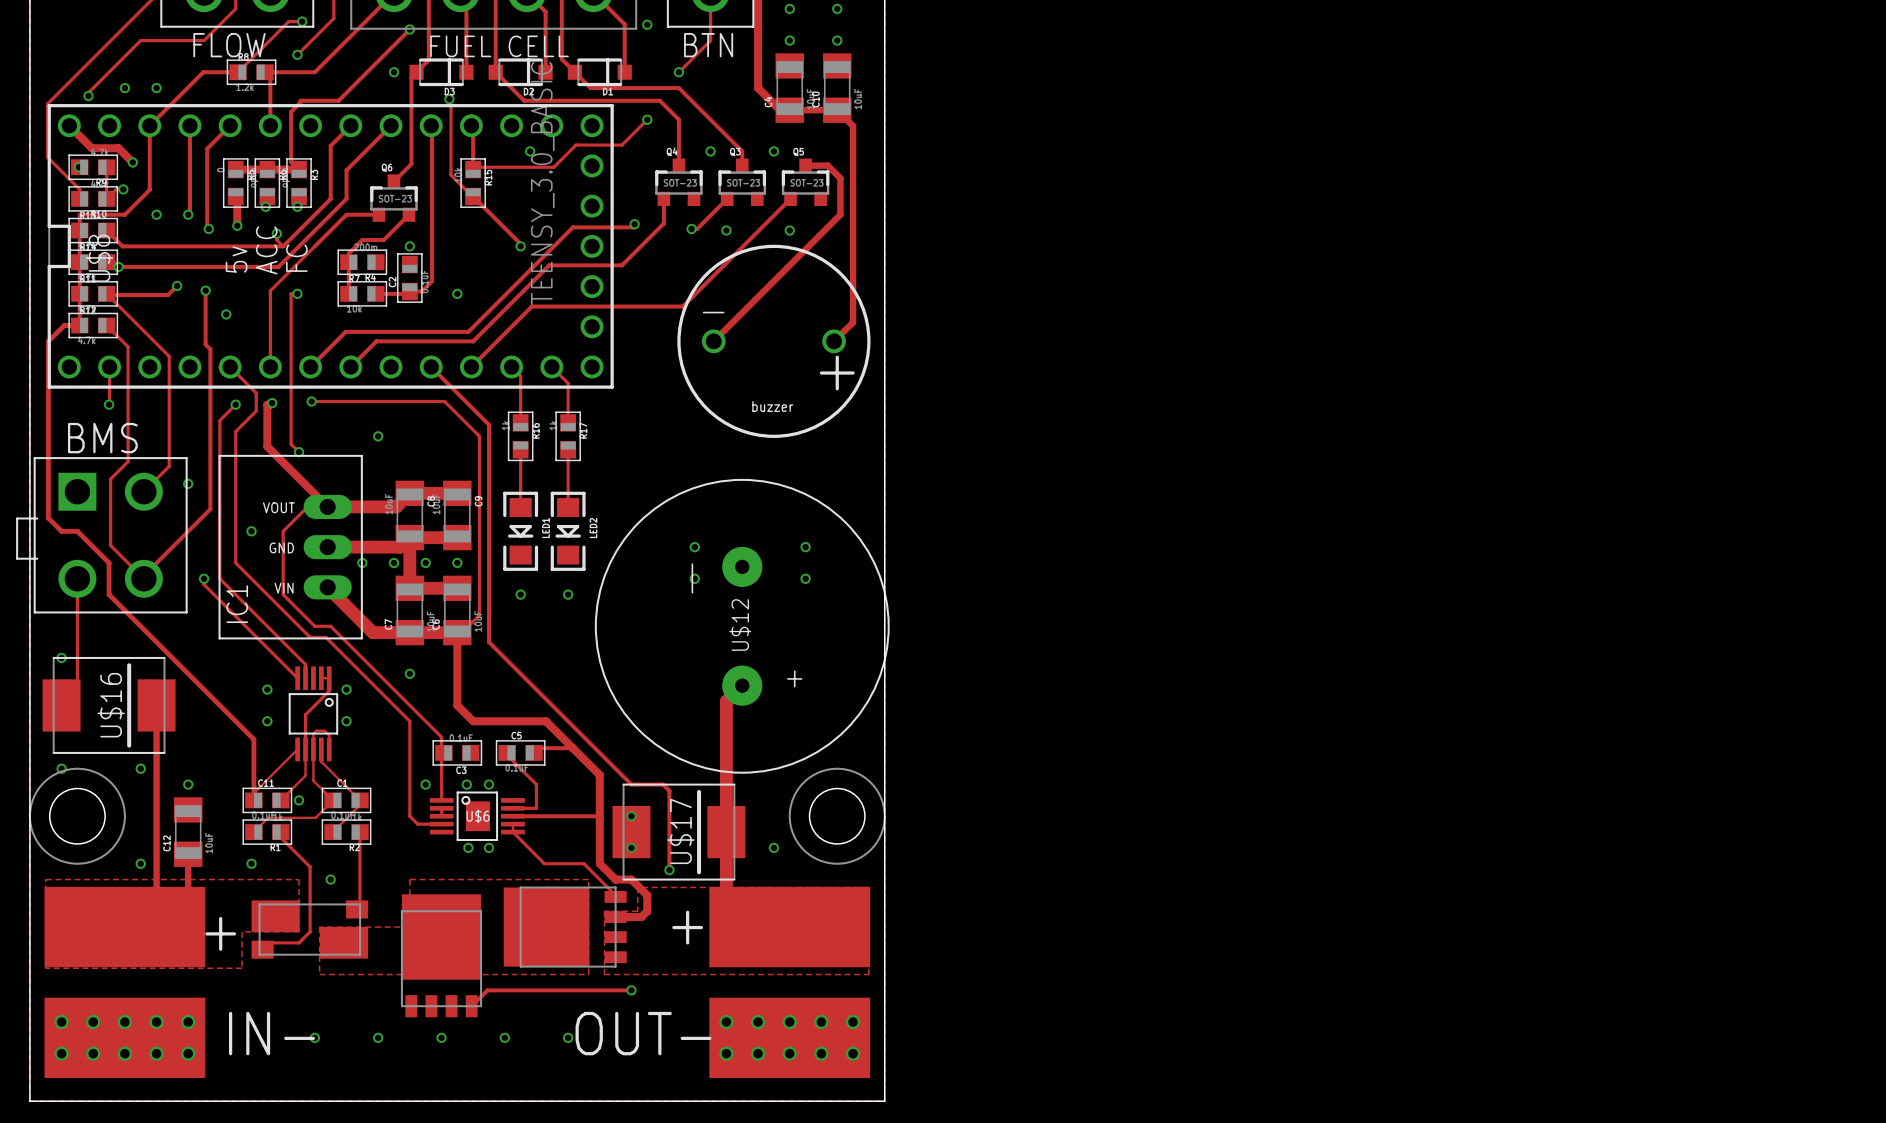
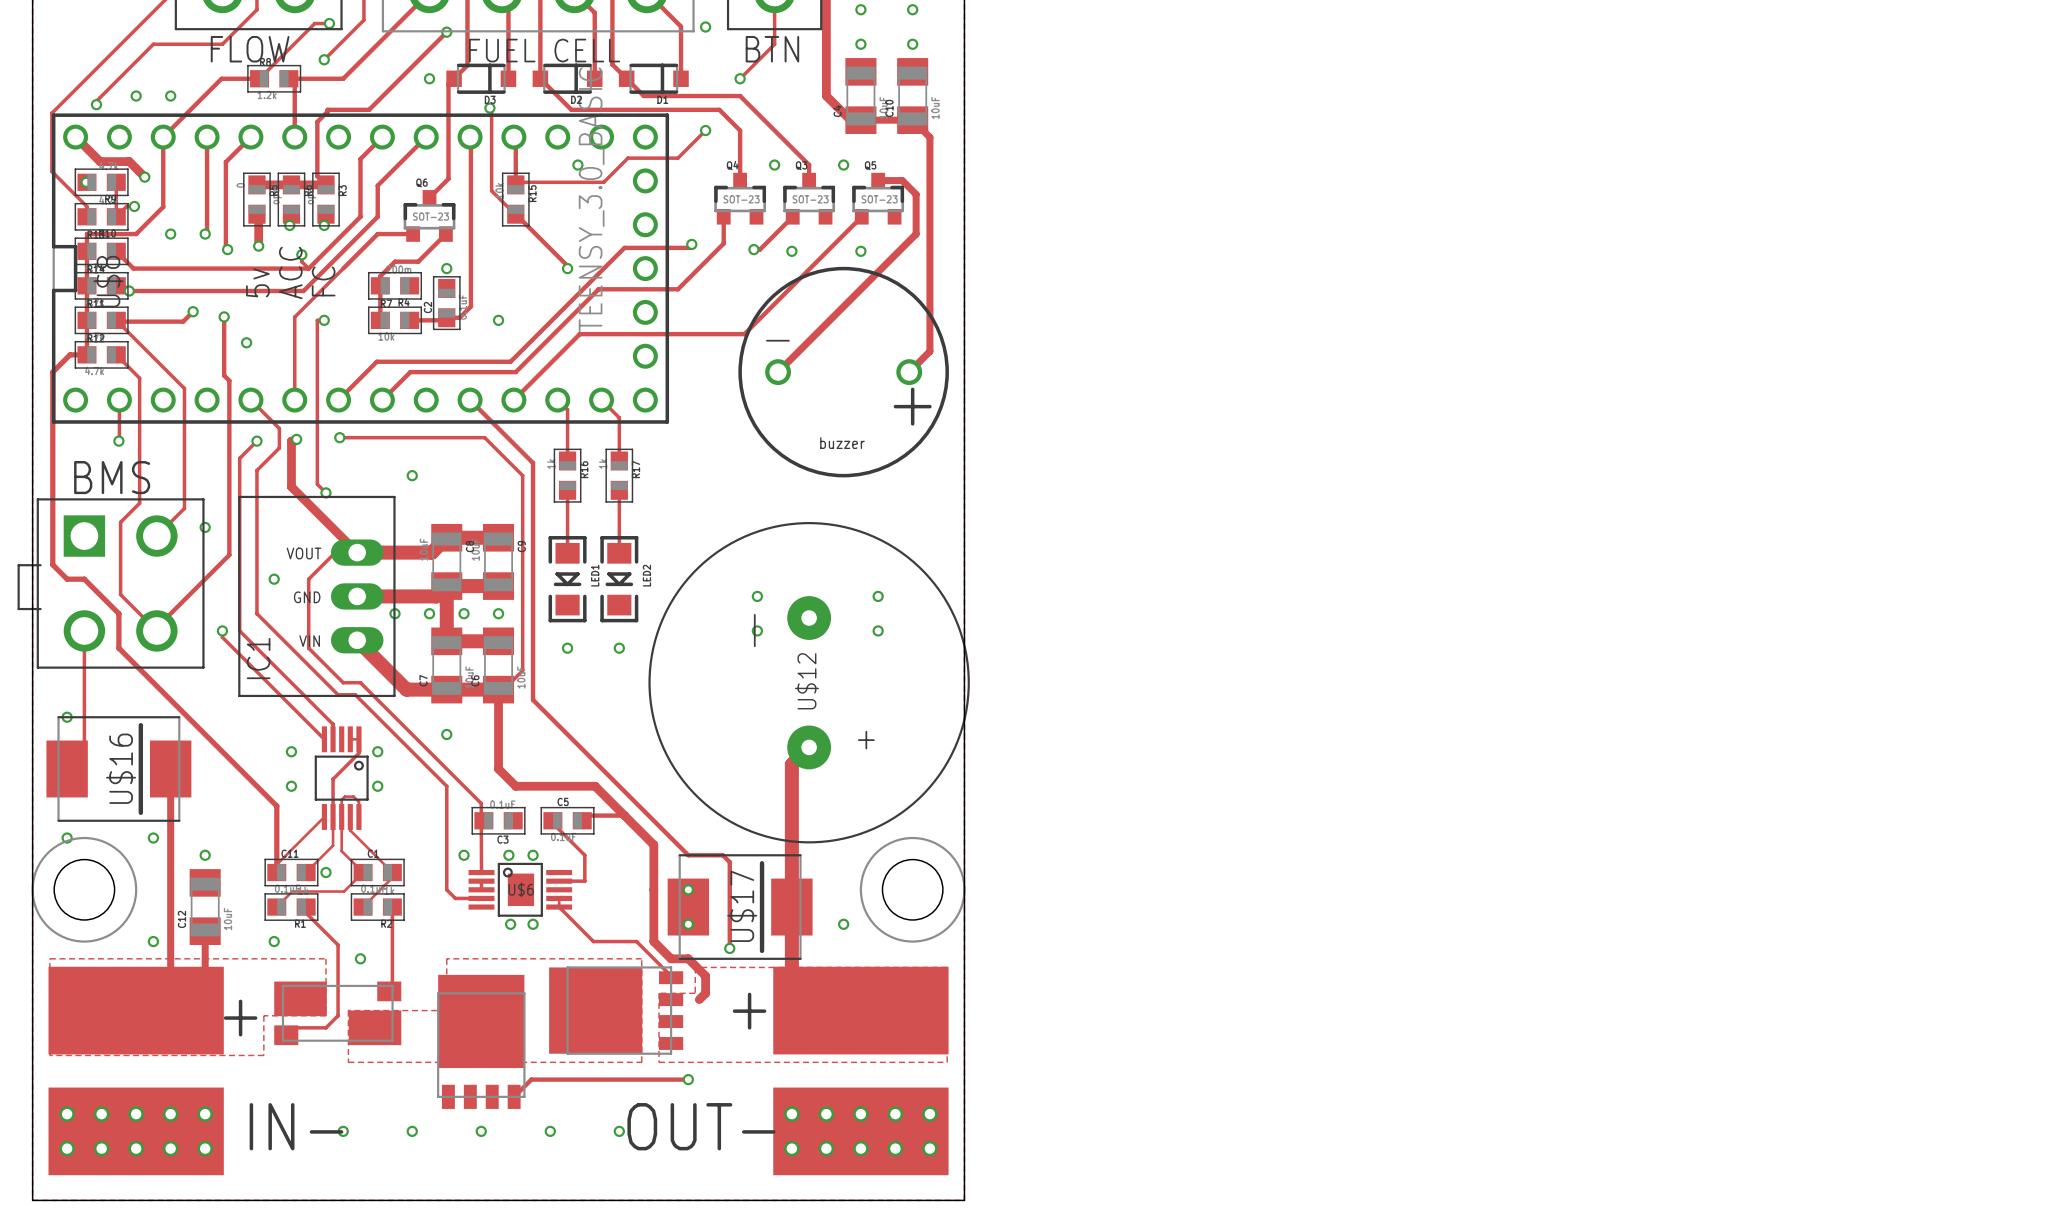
track: (512, 816) (599, 816) -> none
track: (615, 917) (641, 917) -> none

